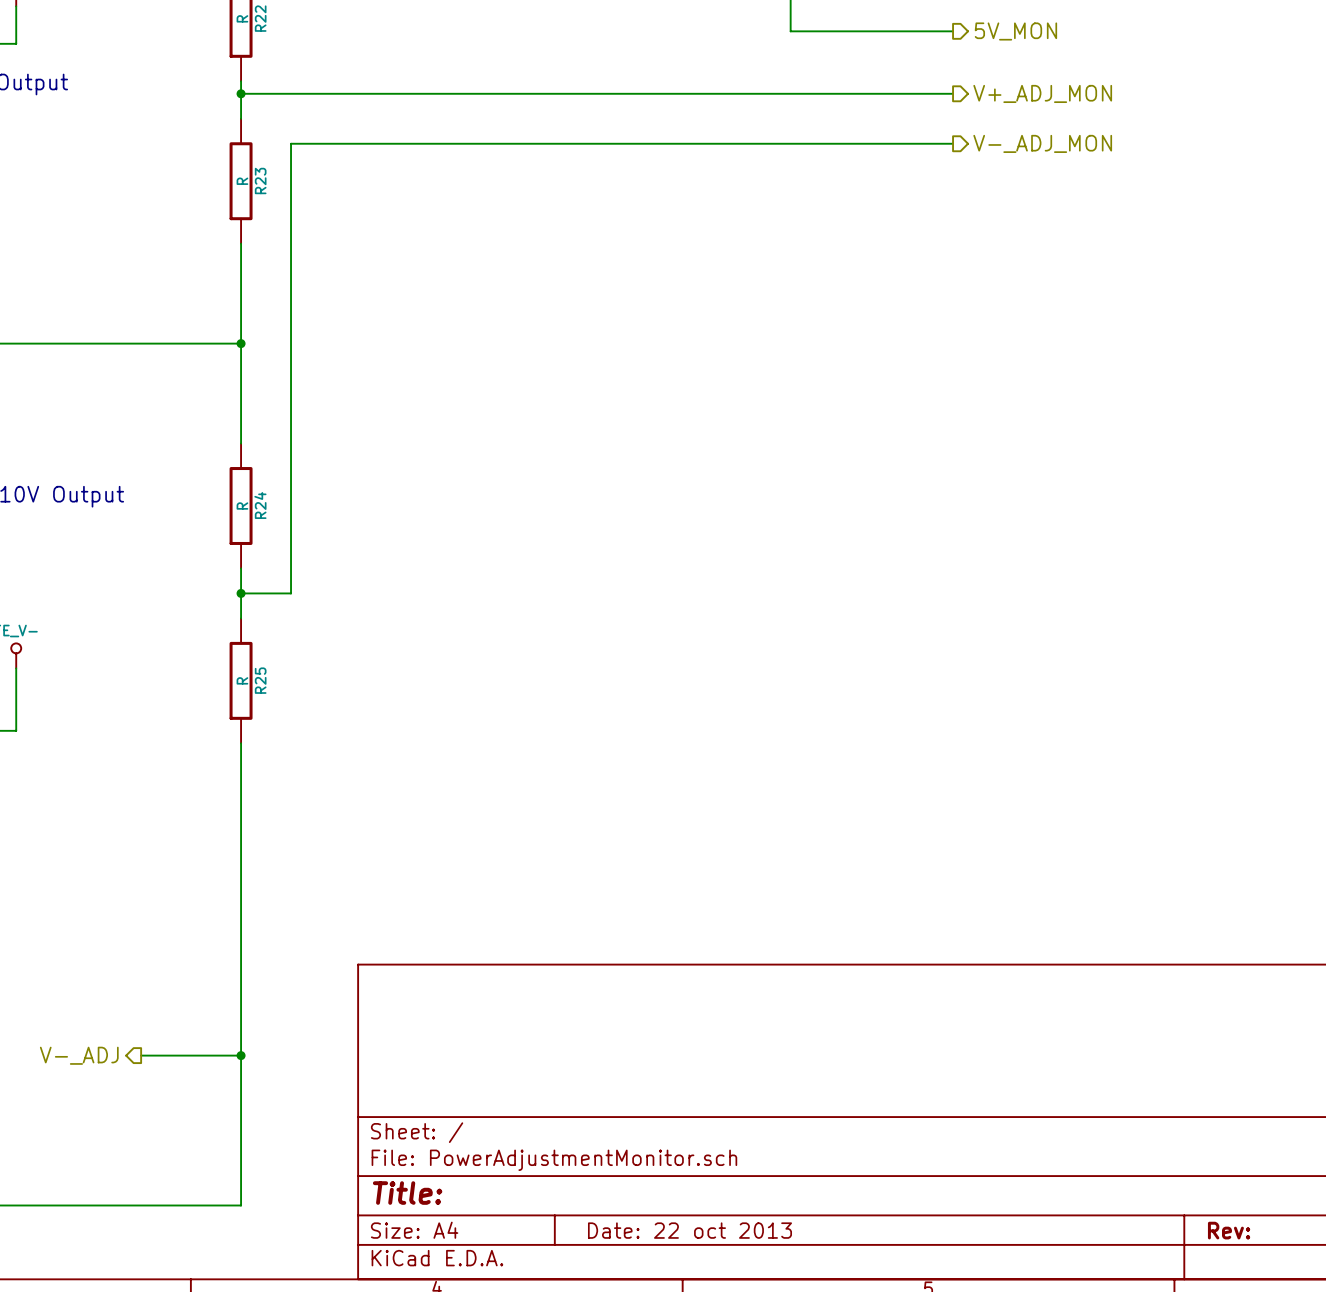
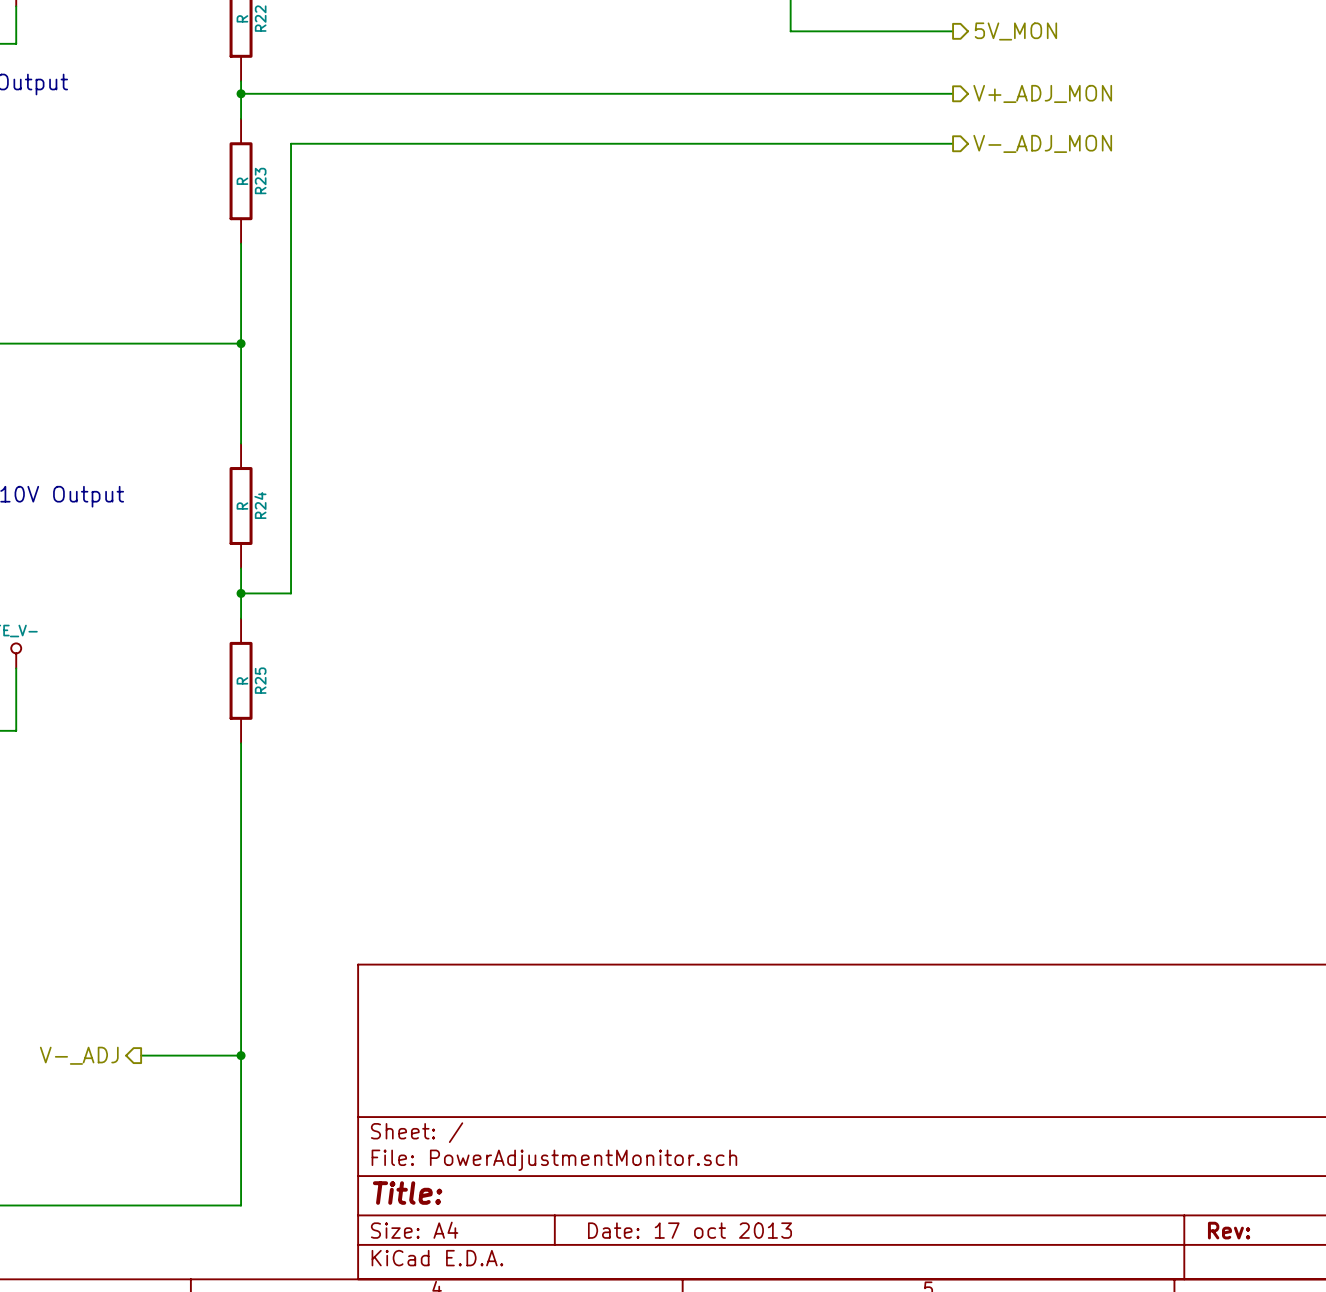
title block: Date: 22 oct 2013 (689, 1230) -> Date: 17 oct 2013 (689, 1230)

